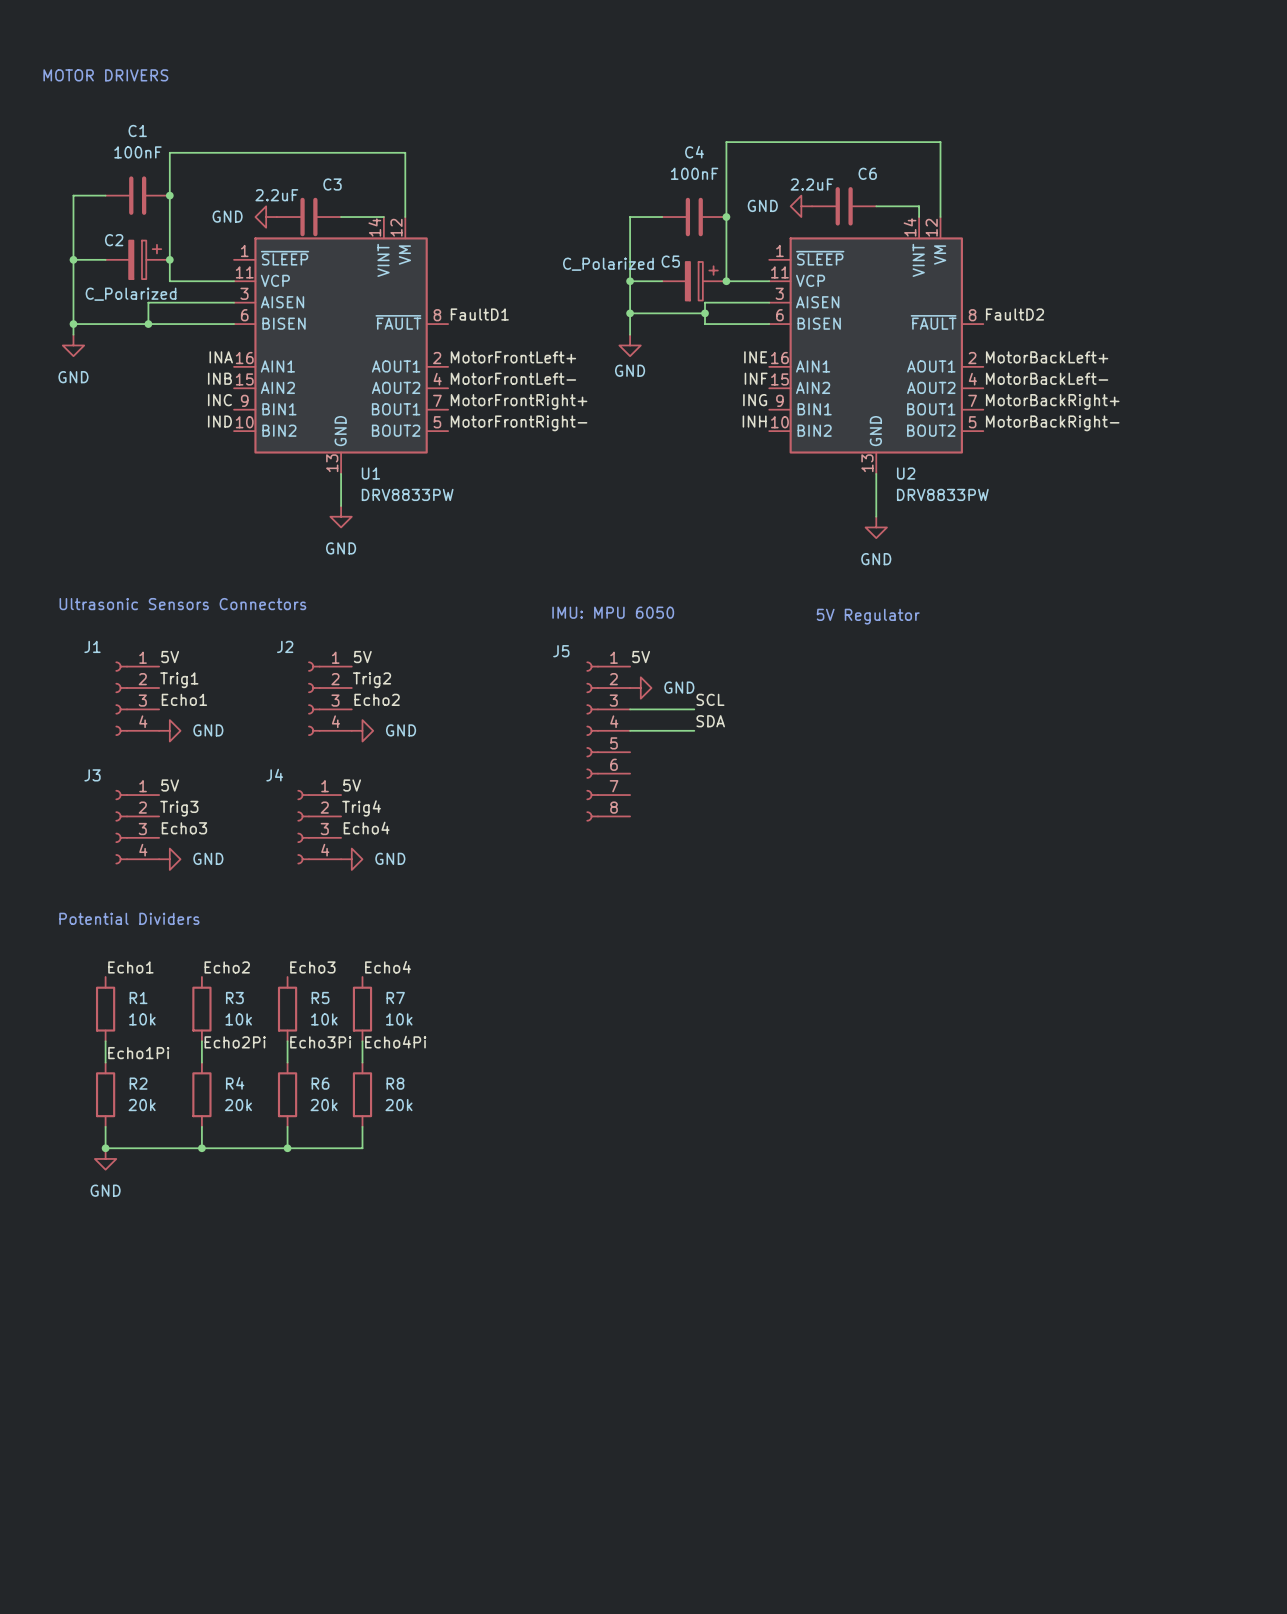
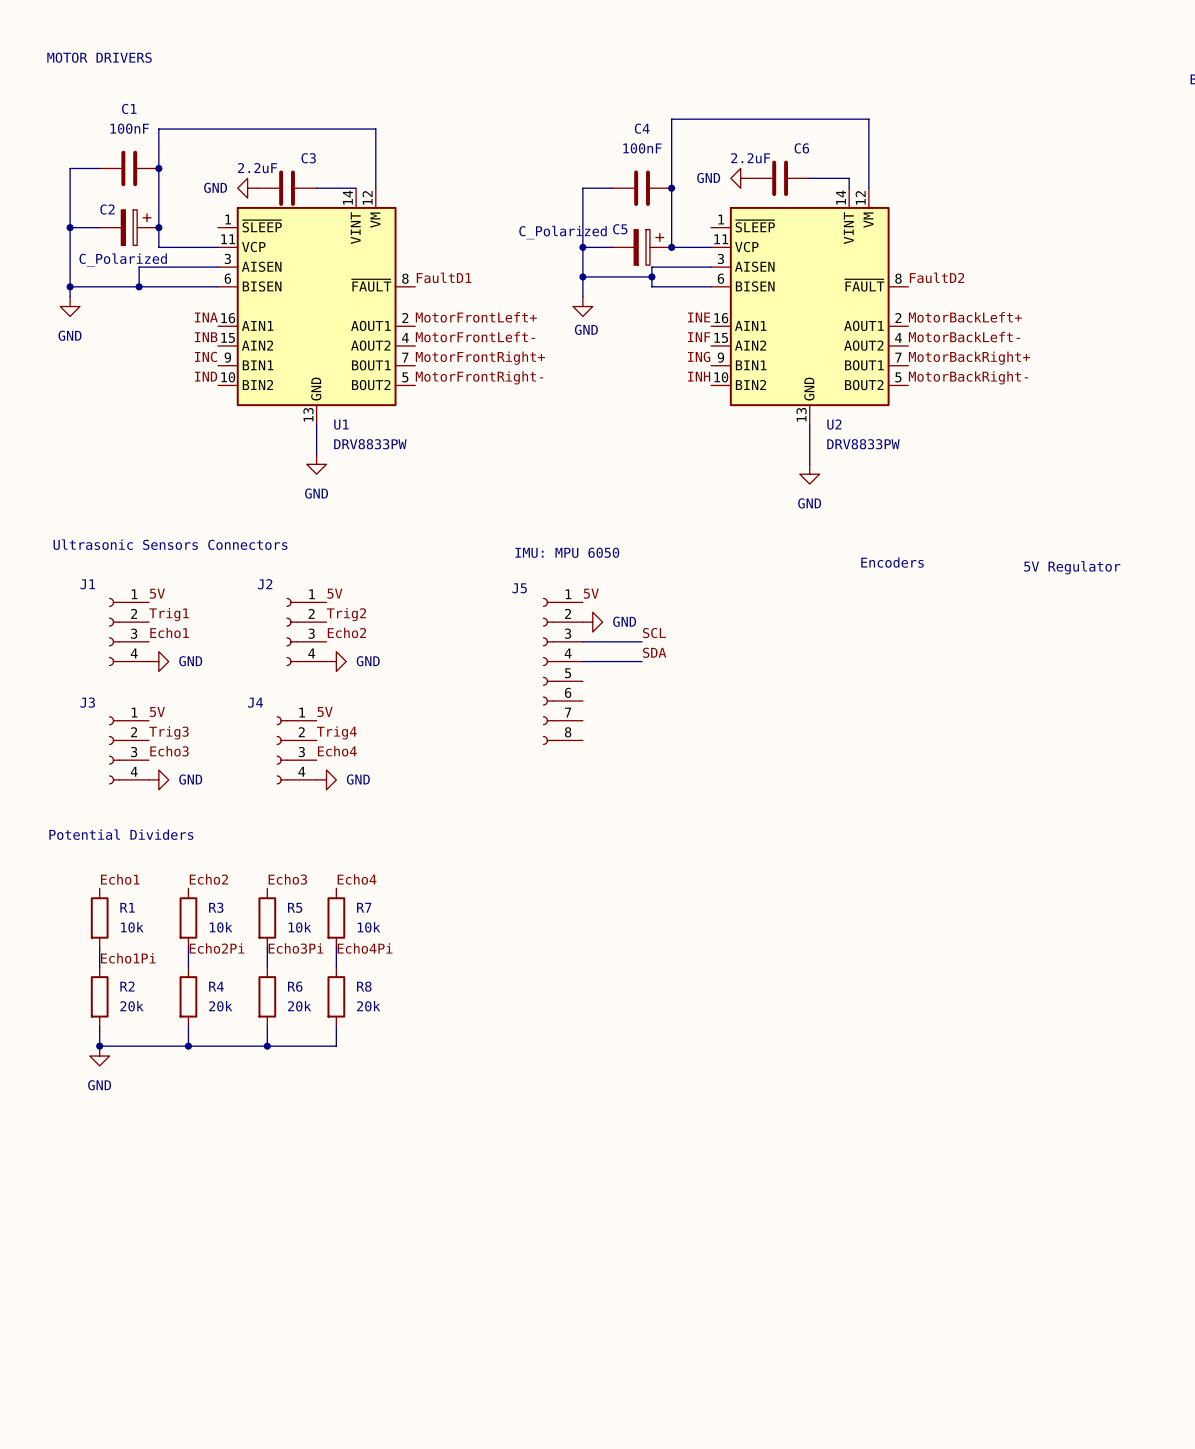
text: 5V Regulator (868, 616) -> none
text: none -> Encoders (892, 562)
text: none -> 5V Regulator (1072, 567)

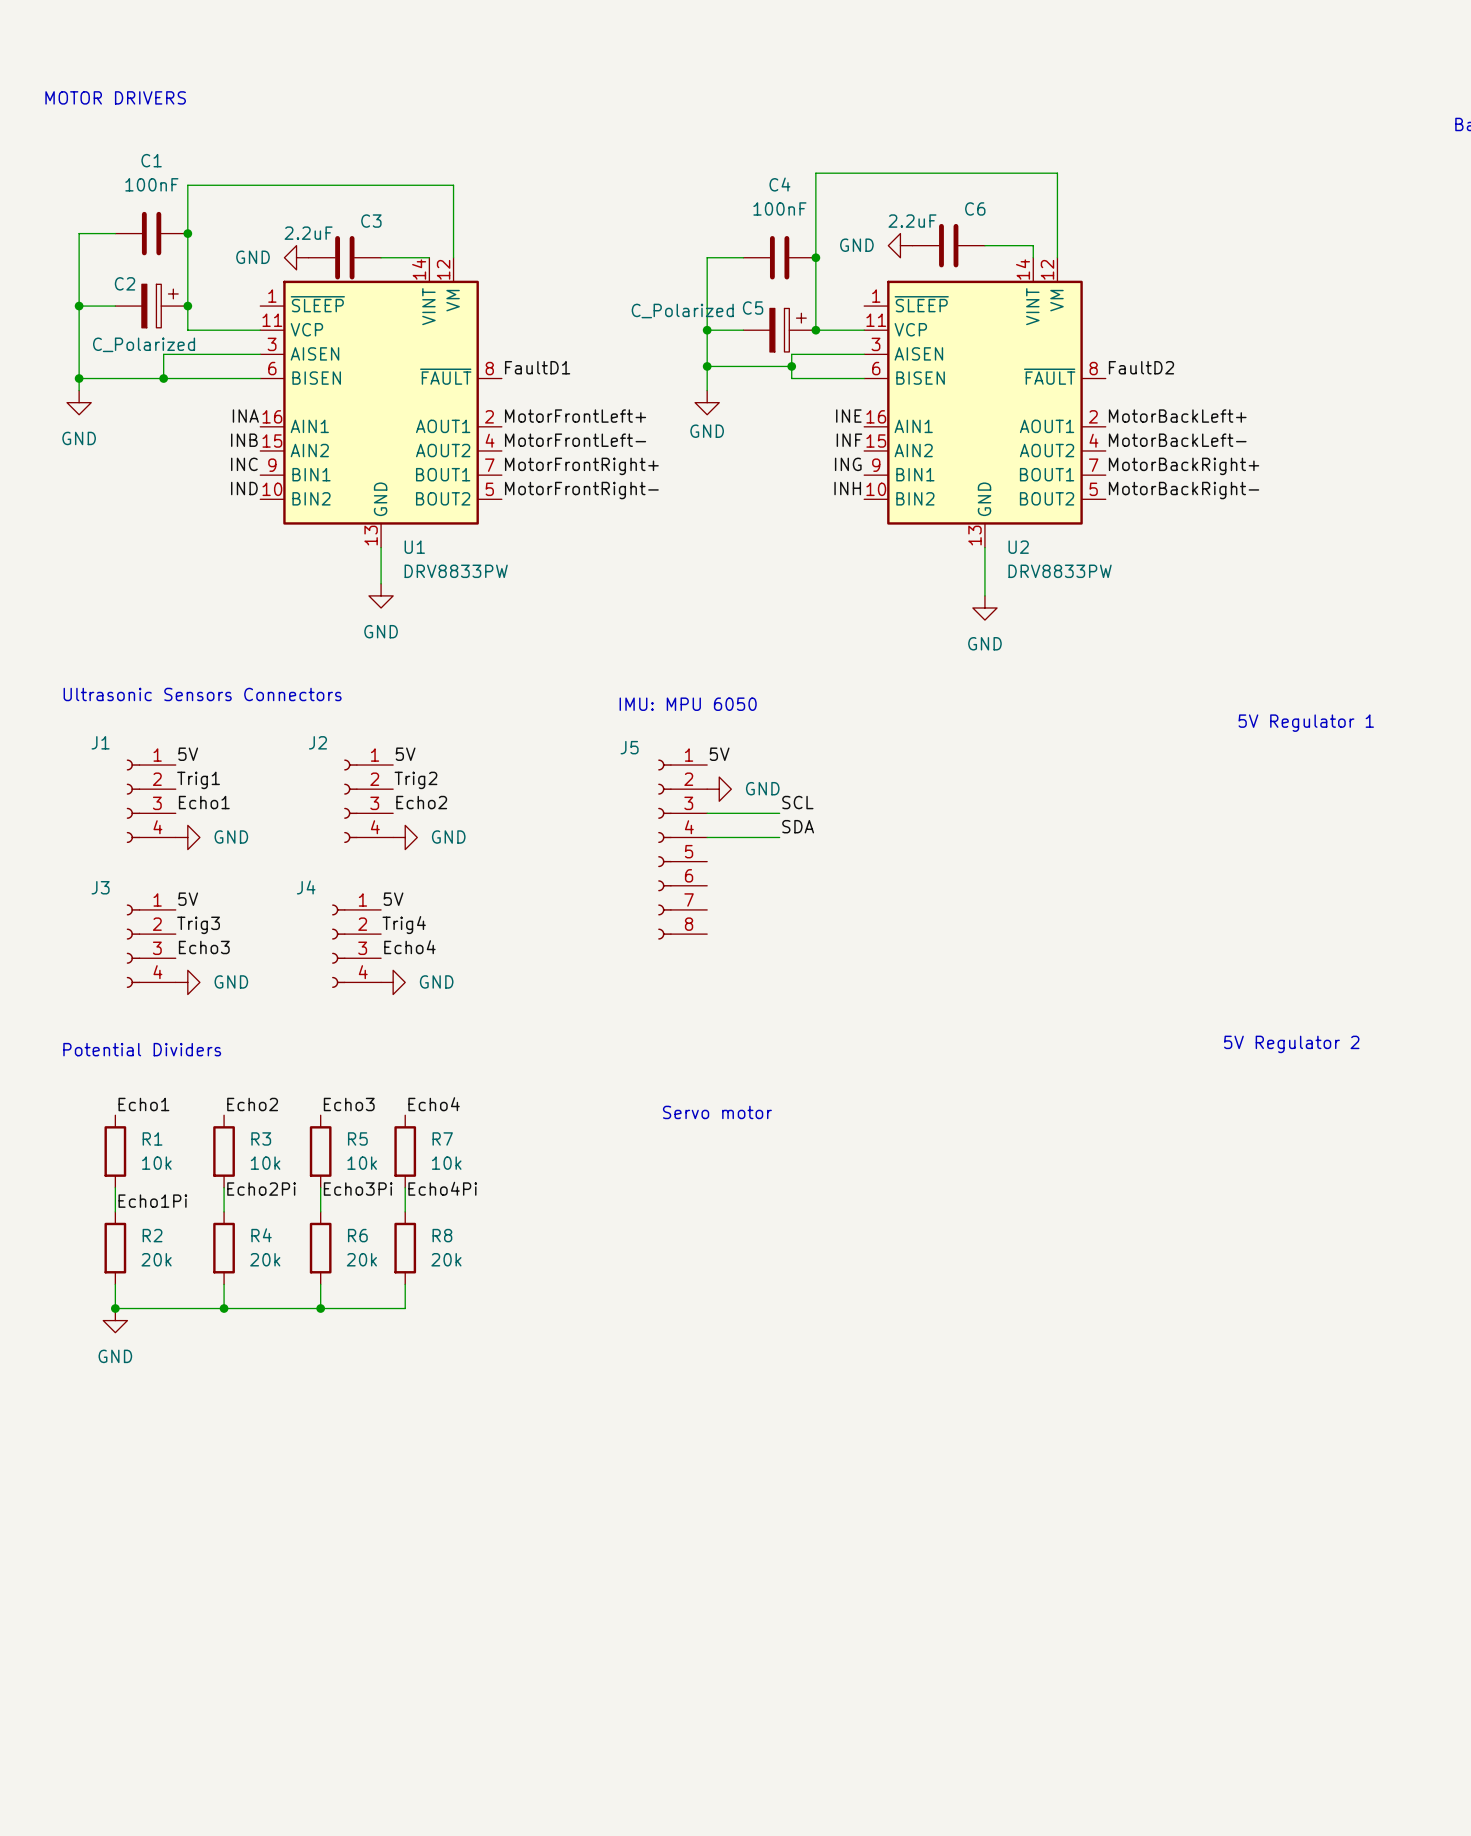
text: Encoders (892, 562) -> none
text: 5V Regulator (1072, 567) -> 5V Regulator 1 (1306, 723)
text: none -> 5V Regulator 2 (1291, 1044)
text: none -> Servo motor (717, 1112)

